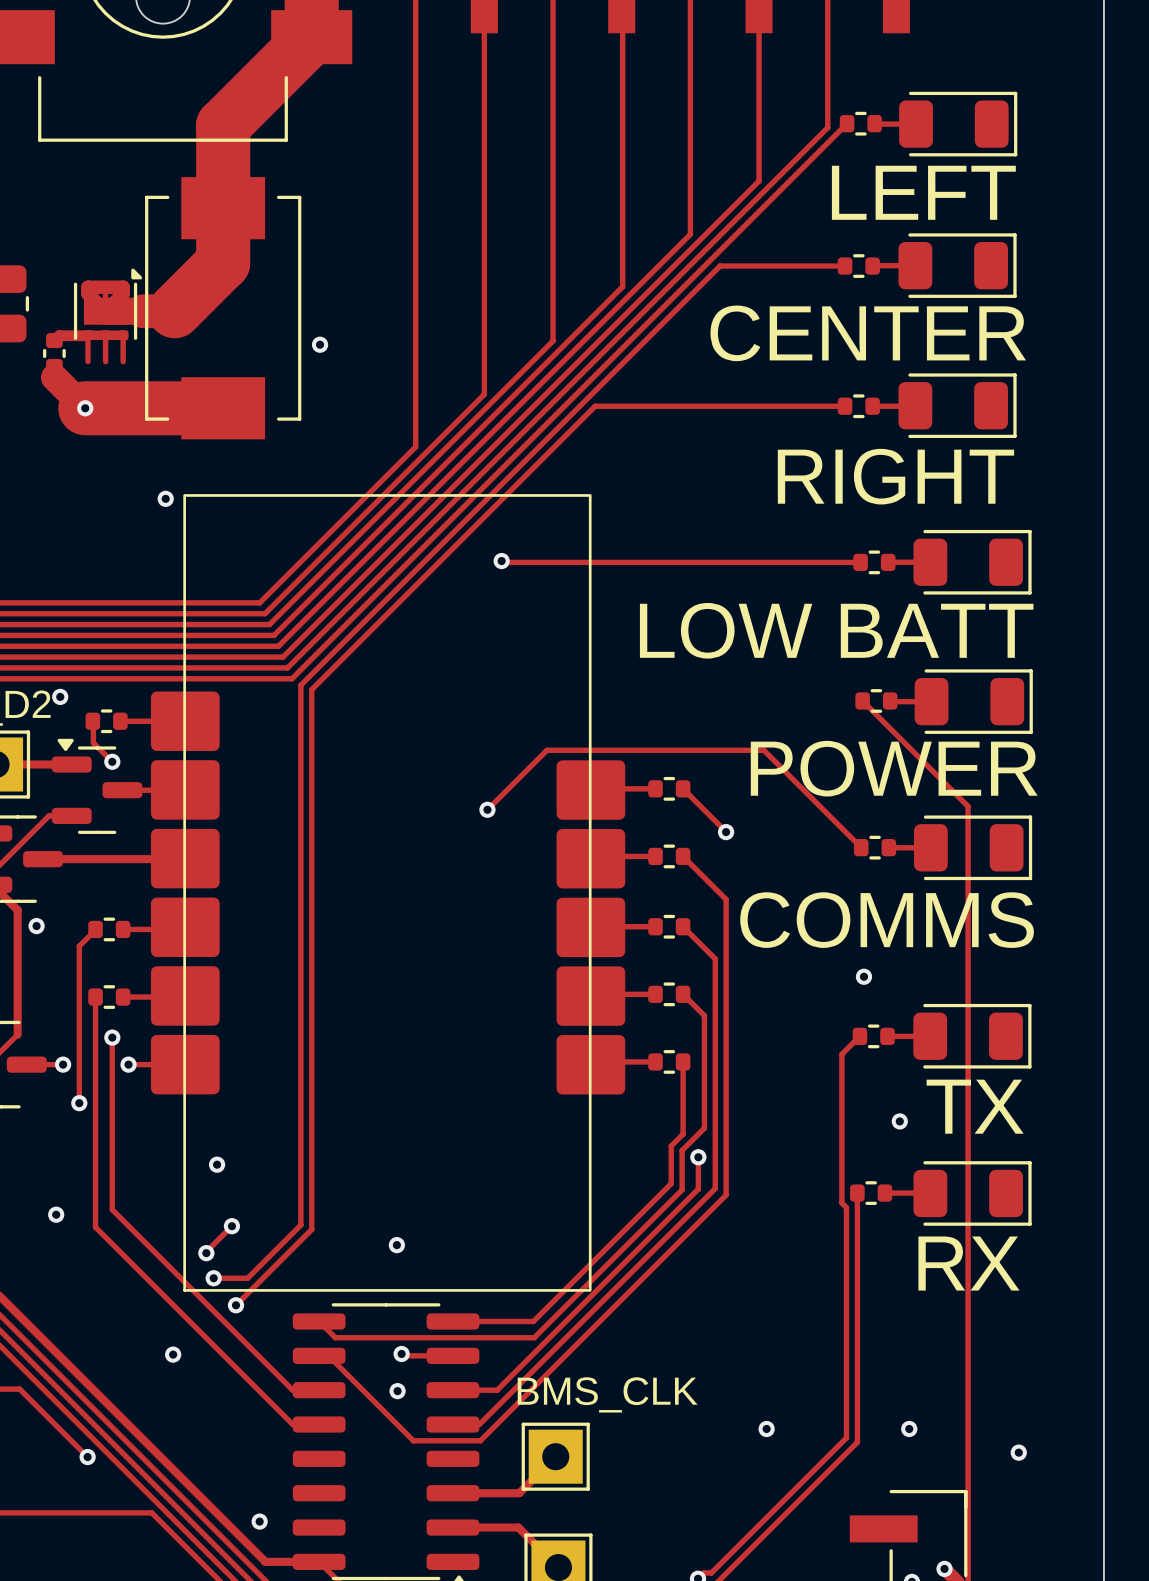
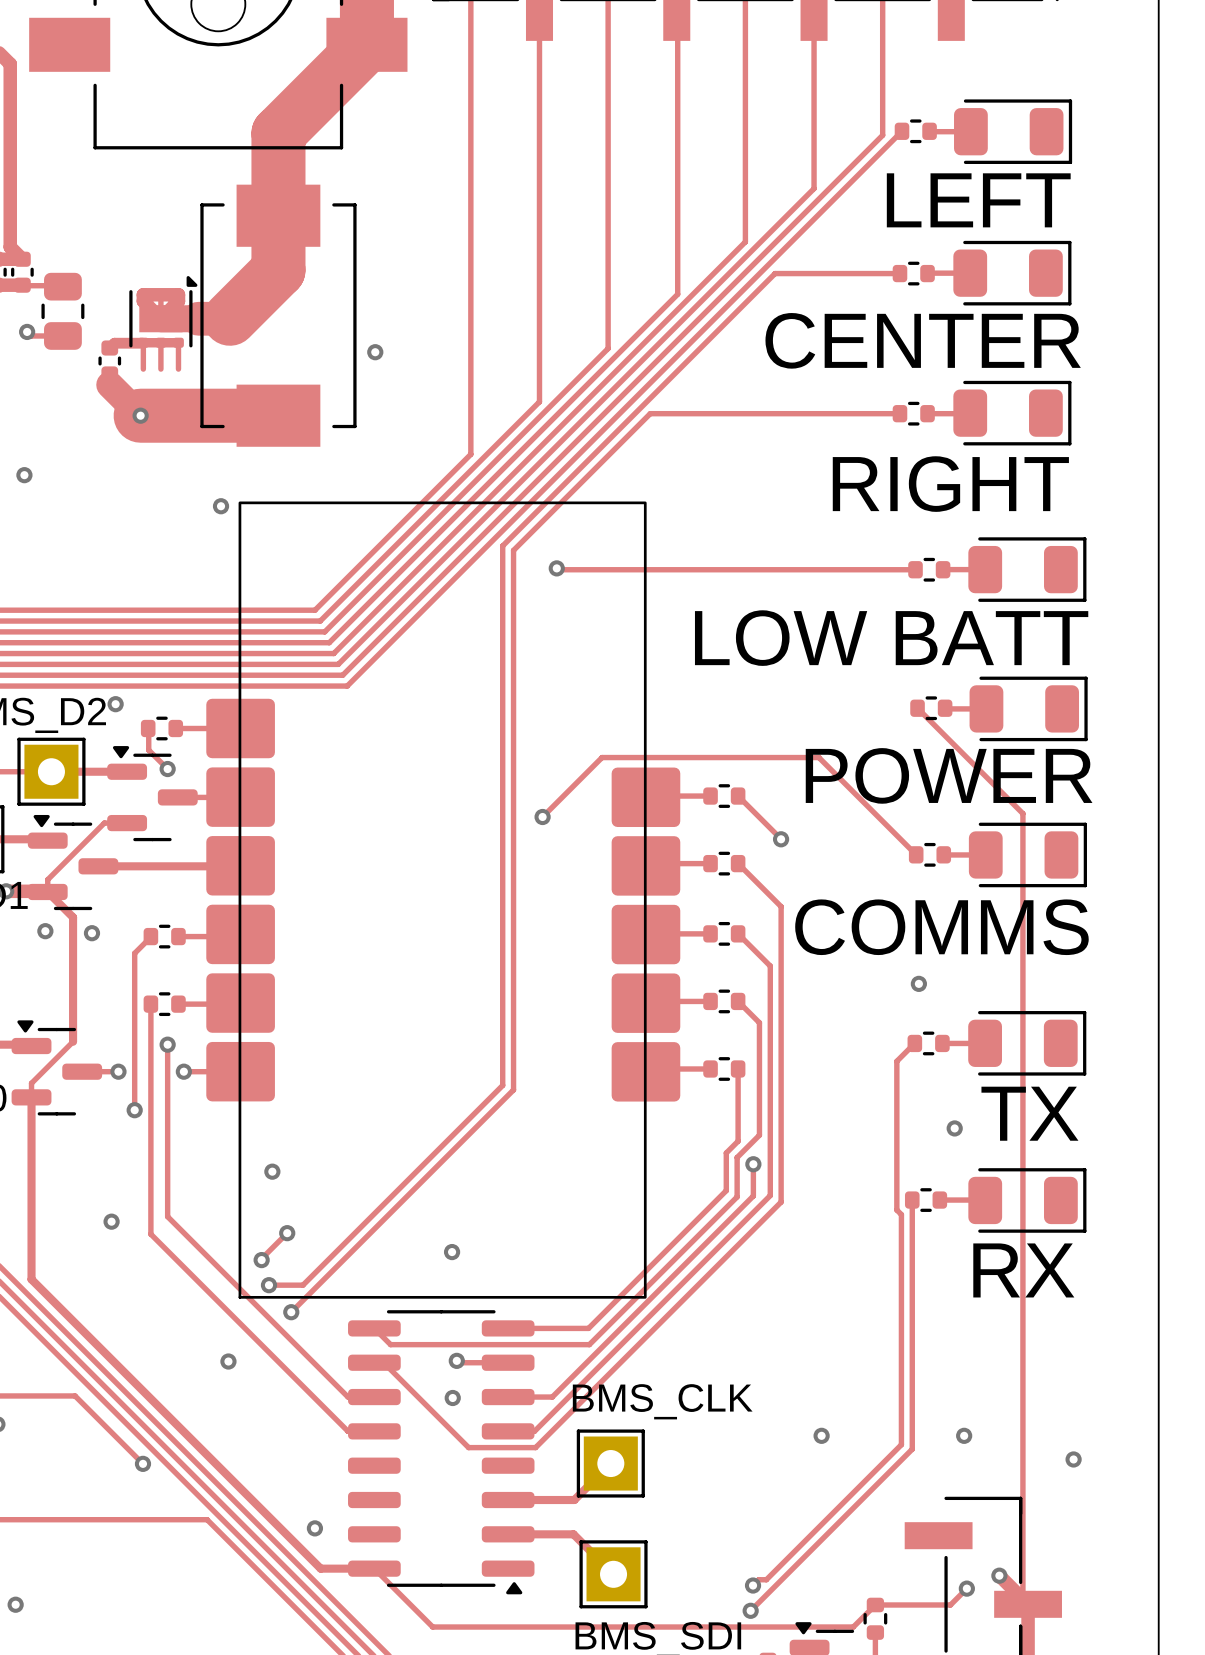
track: (447, 538) (300, 685) (300, 1225) -> (502, 545) (502, 1085) (356, 1232)
track: (458, 543) (311, 689) (311, 1229) -> (513, 550) (513, 1089) (366, 1236)

